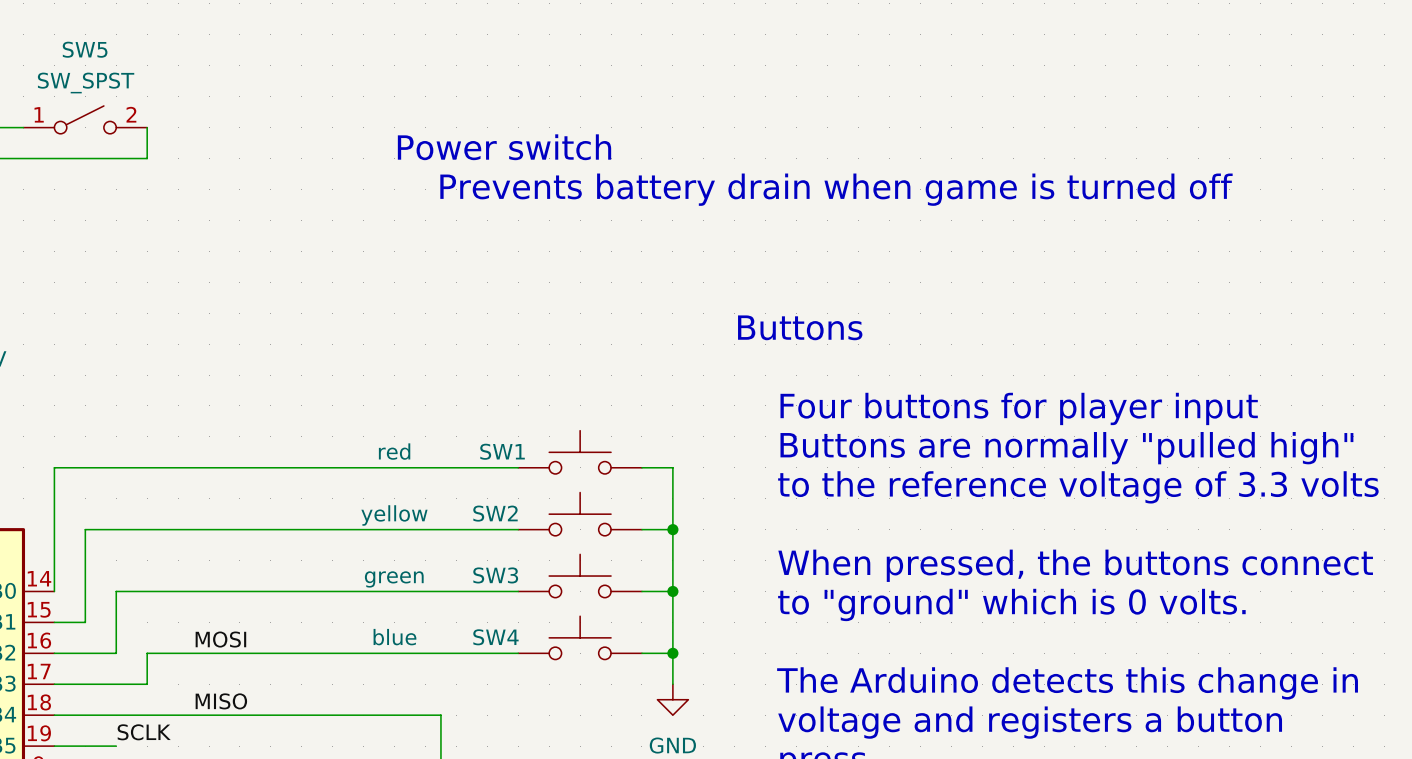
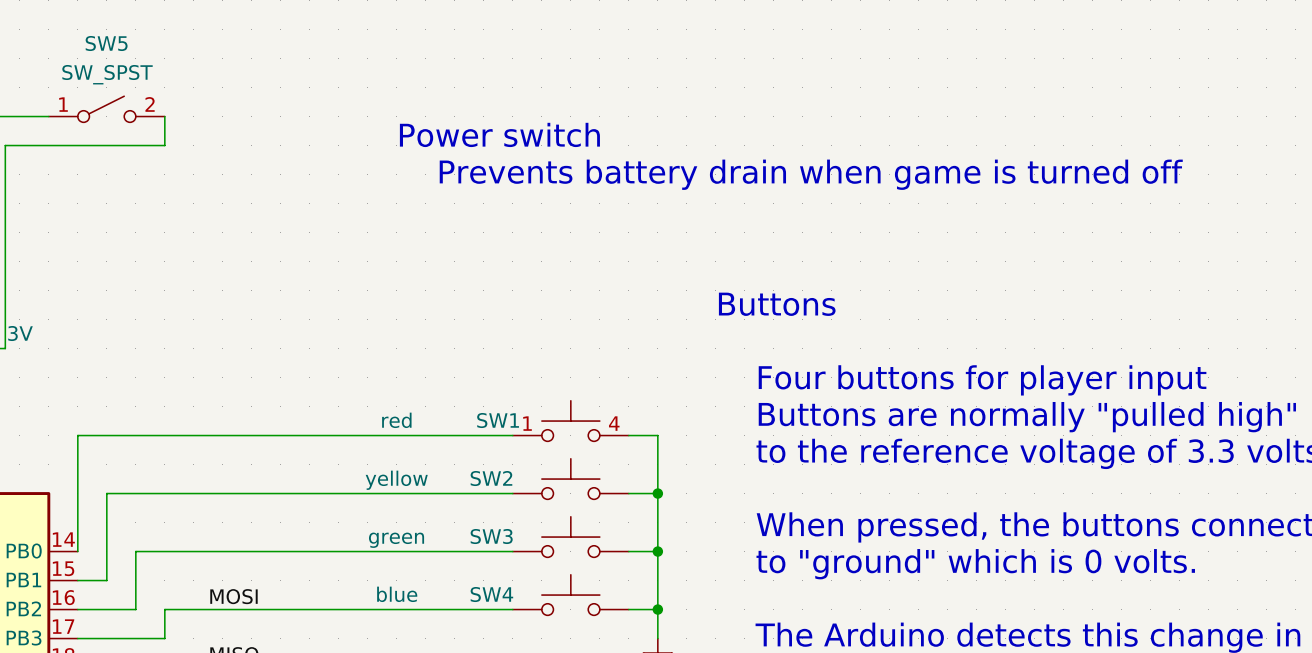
SW1 pin number: none -> 1 (527, 423)
SW1 pin number: none -> 4 (614, 423)

